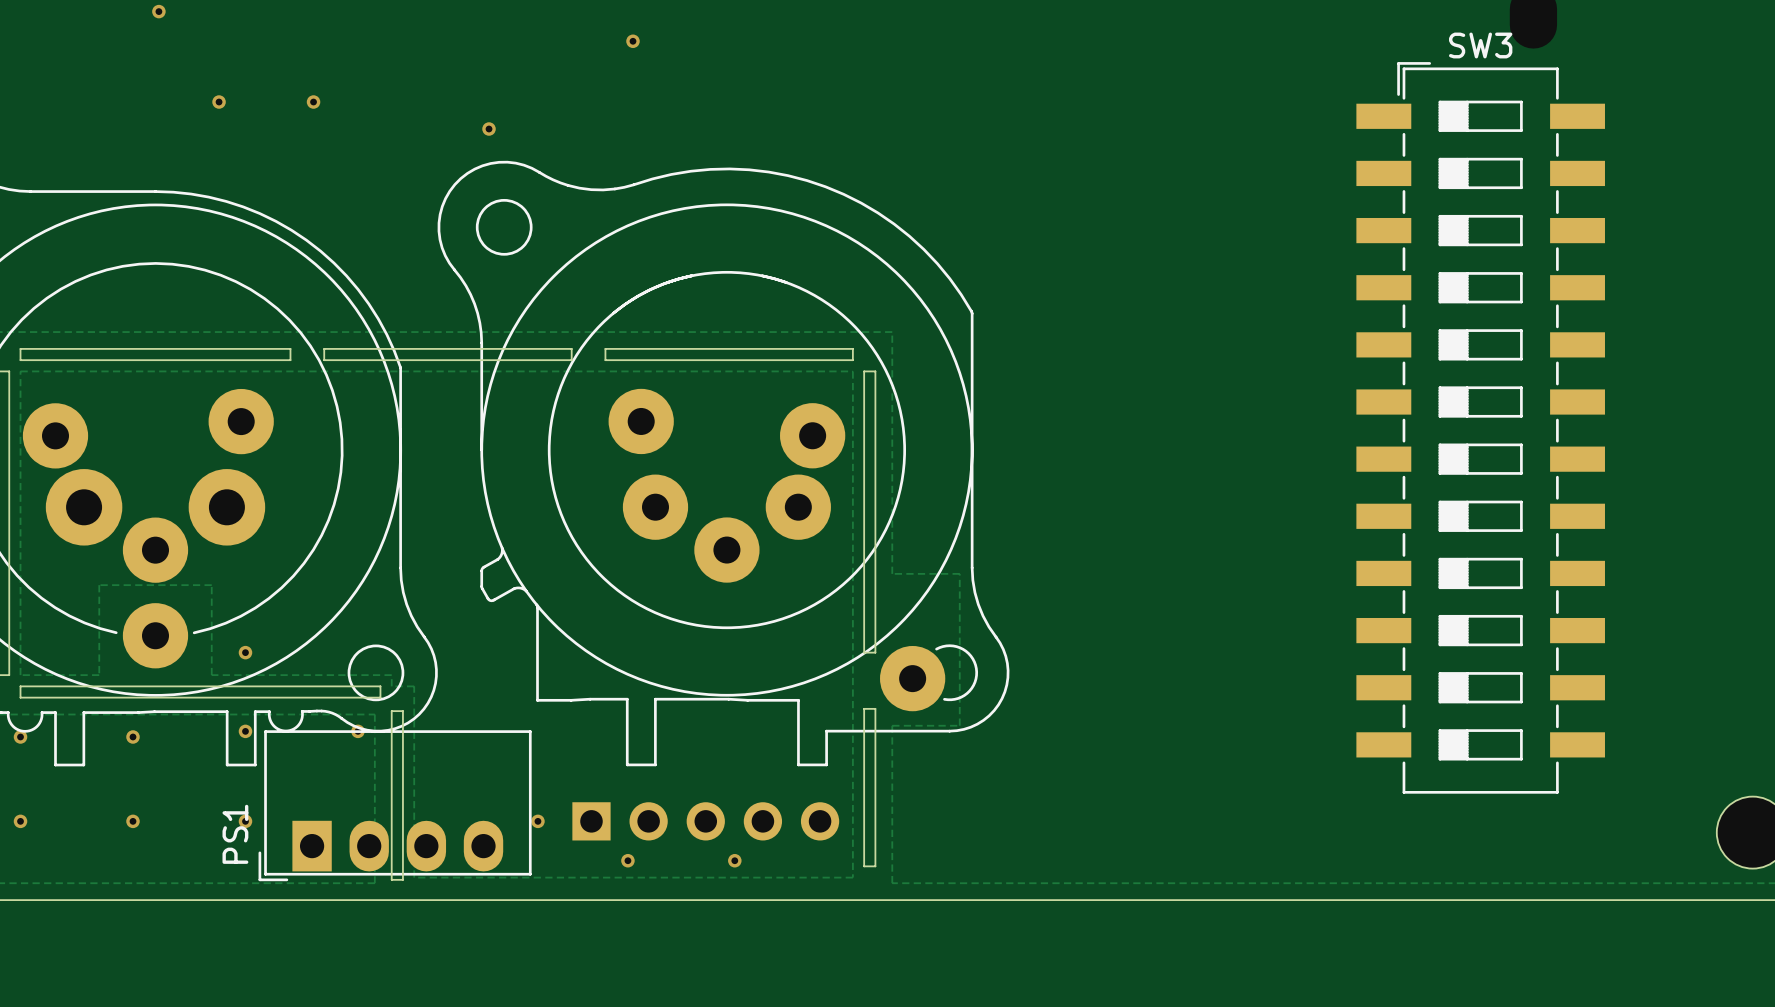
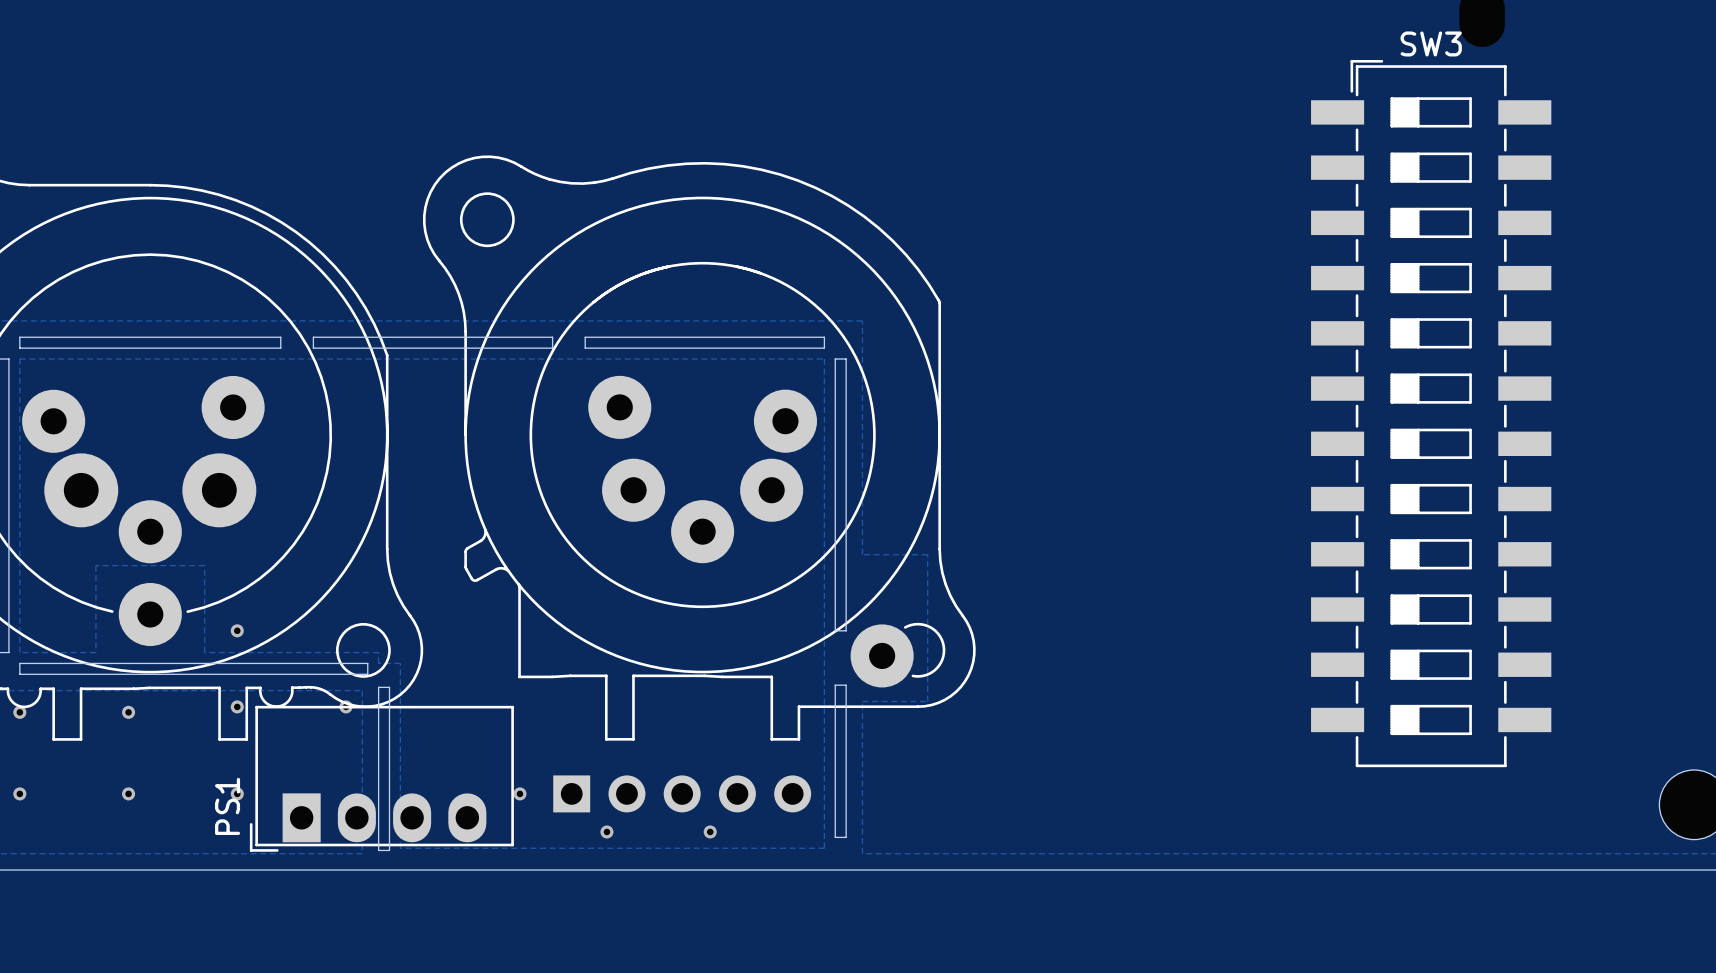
via: (158, 11) -> none
via: (632, 41) -> none
via: (219, 102) -> none
via: (313, 102) -> none
via: (489, 129) -> none

